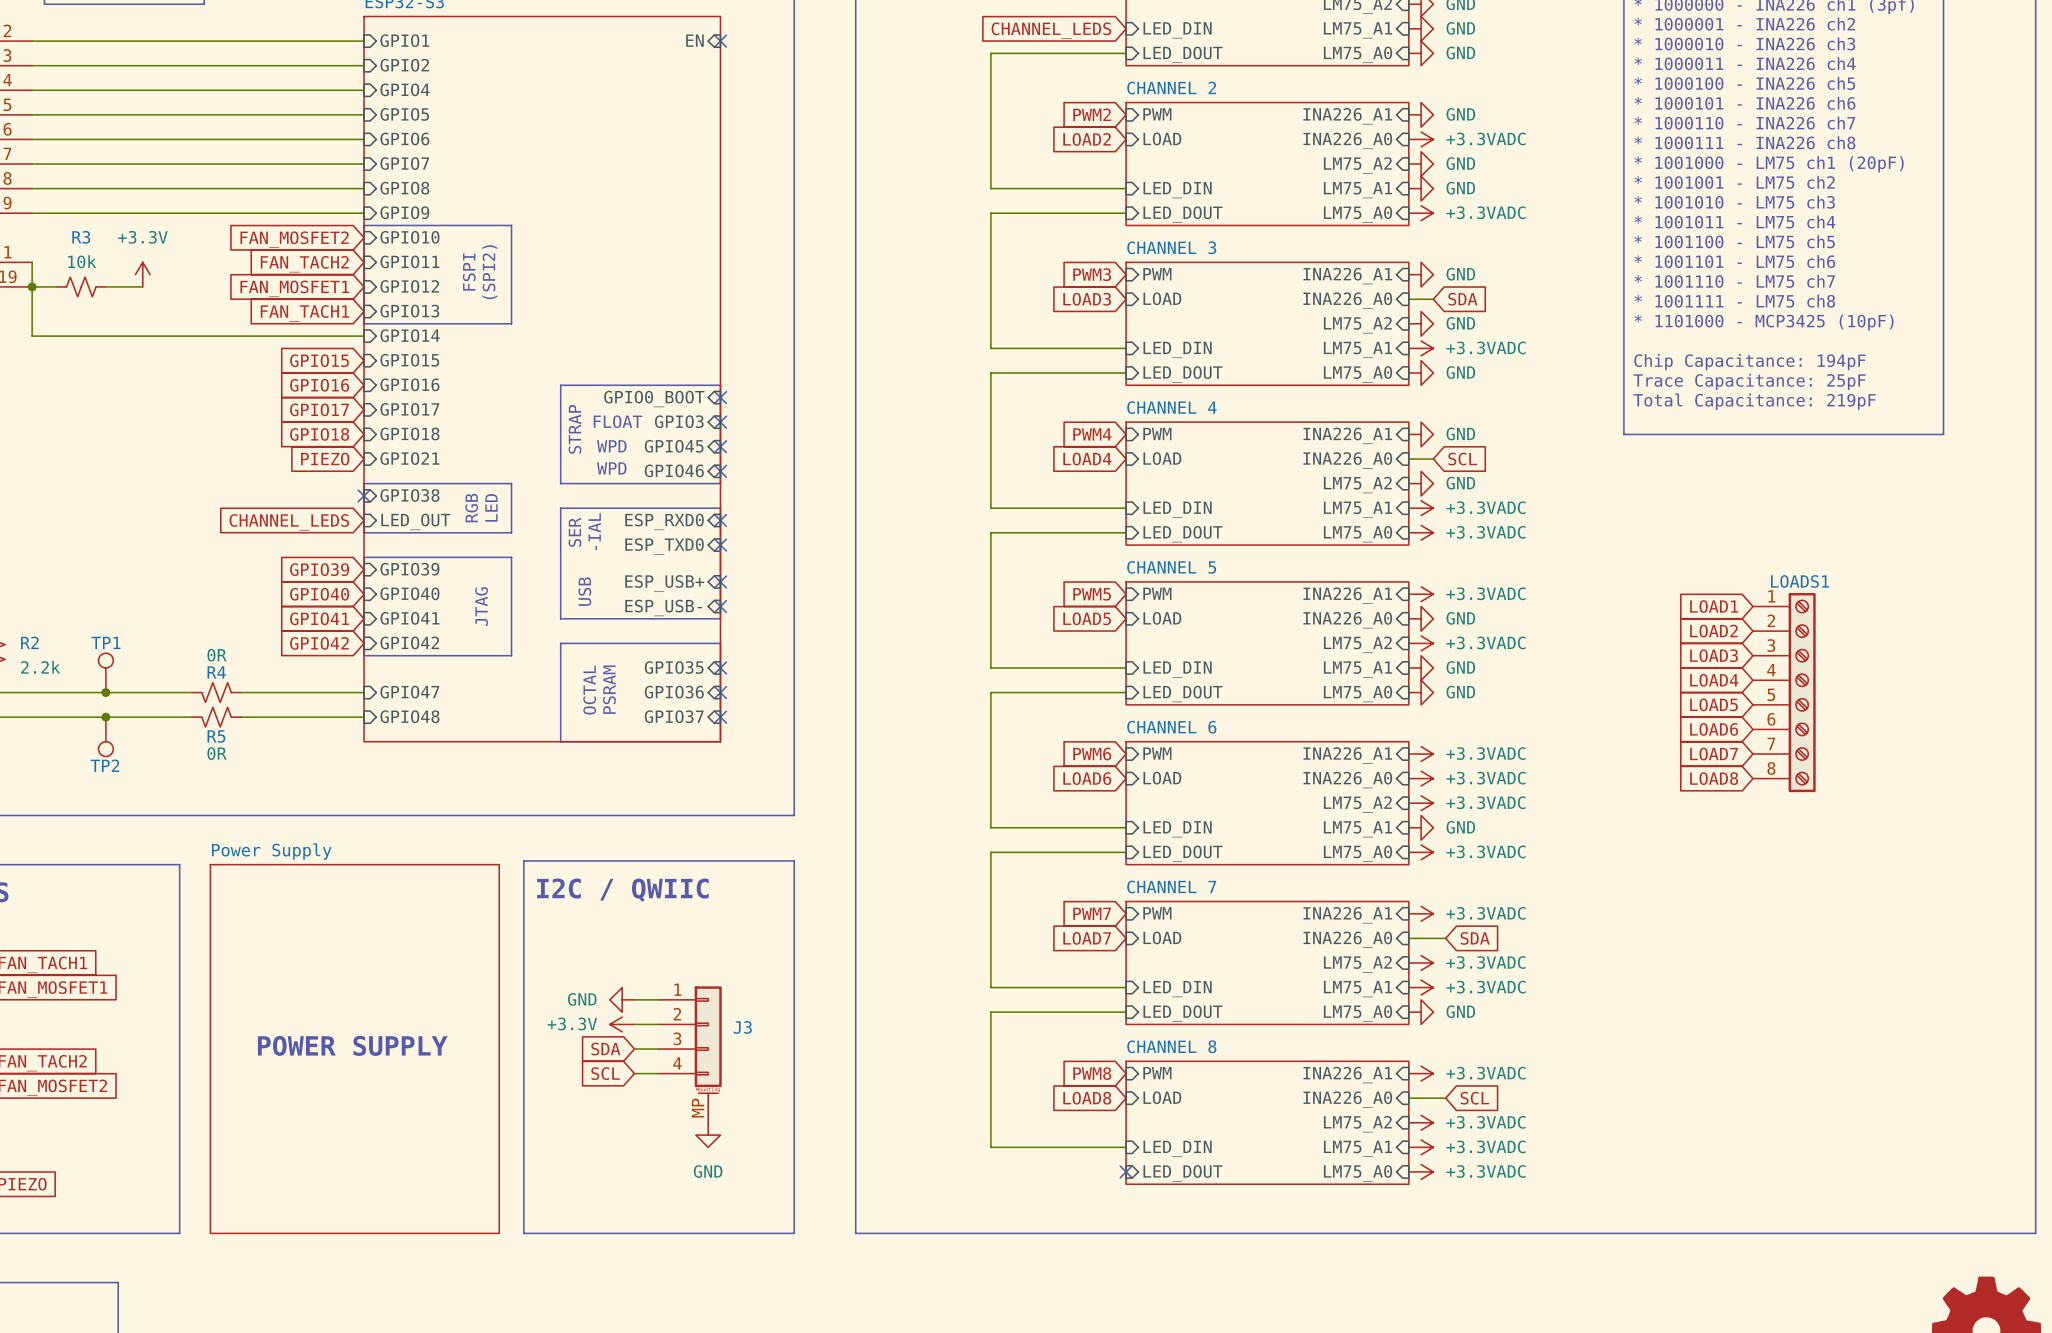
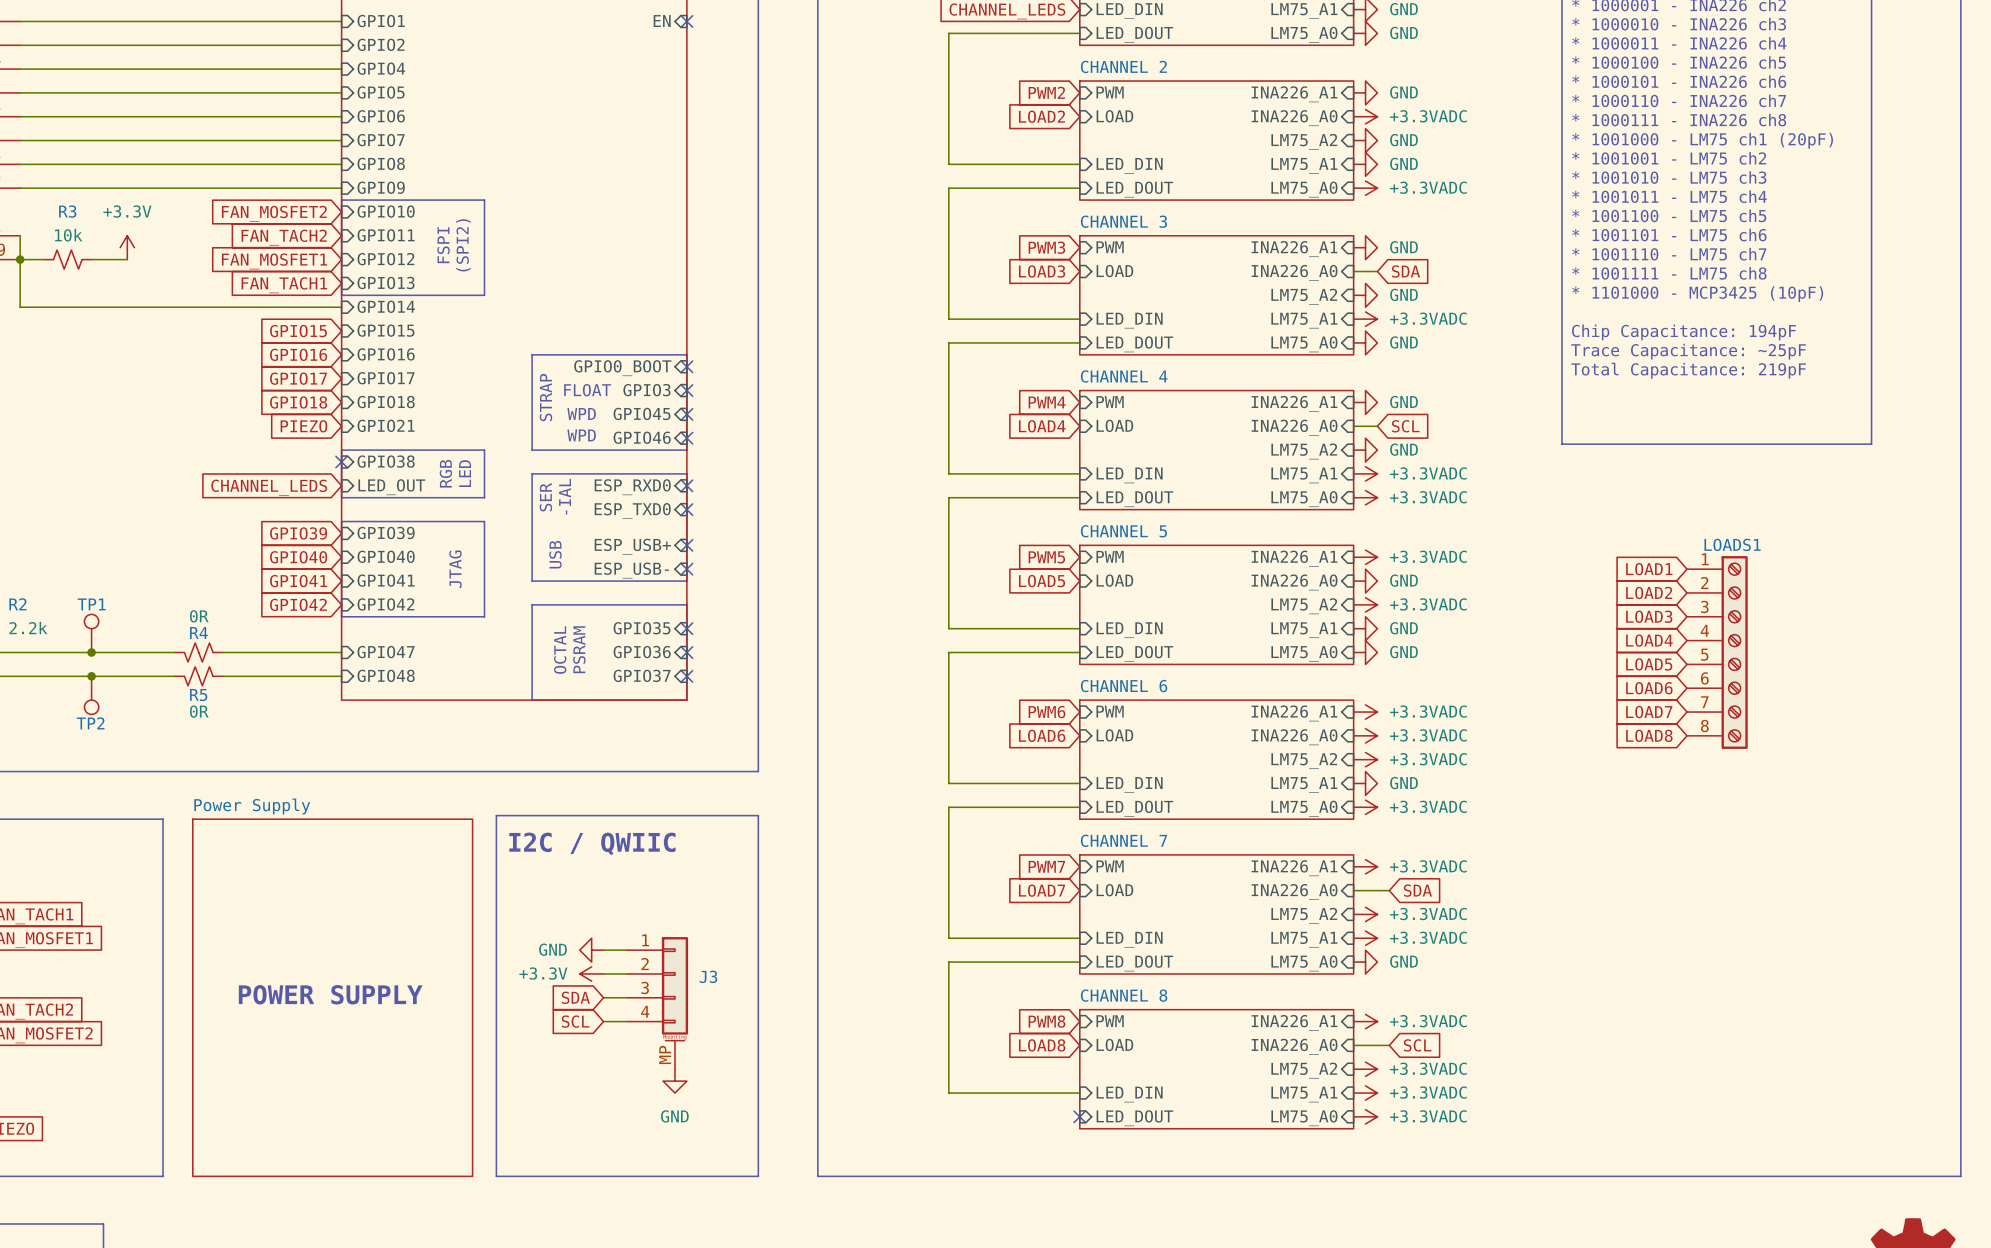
text: Trace Capacitance: 25pF (1749, 381) -> Trace Capacitance: ~25pF (1688, 351)
line: (1623, 434) (1943, 434) -> (1561, 402) (1561, 444) (1871, 444) (1871, 402)

